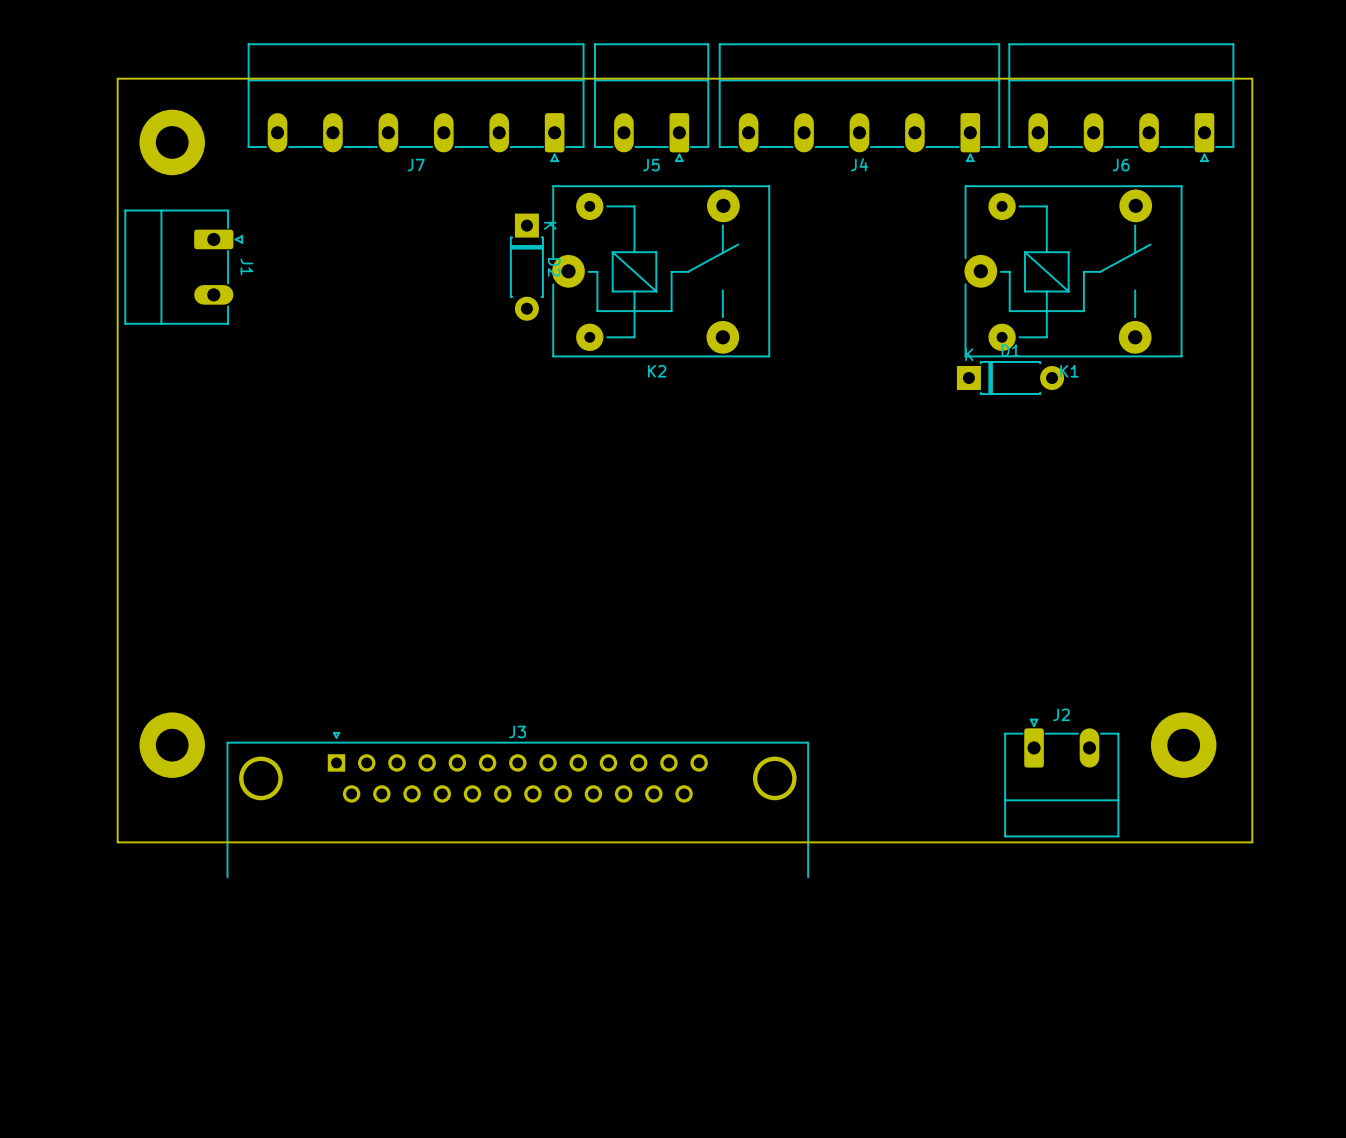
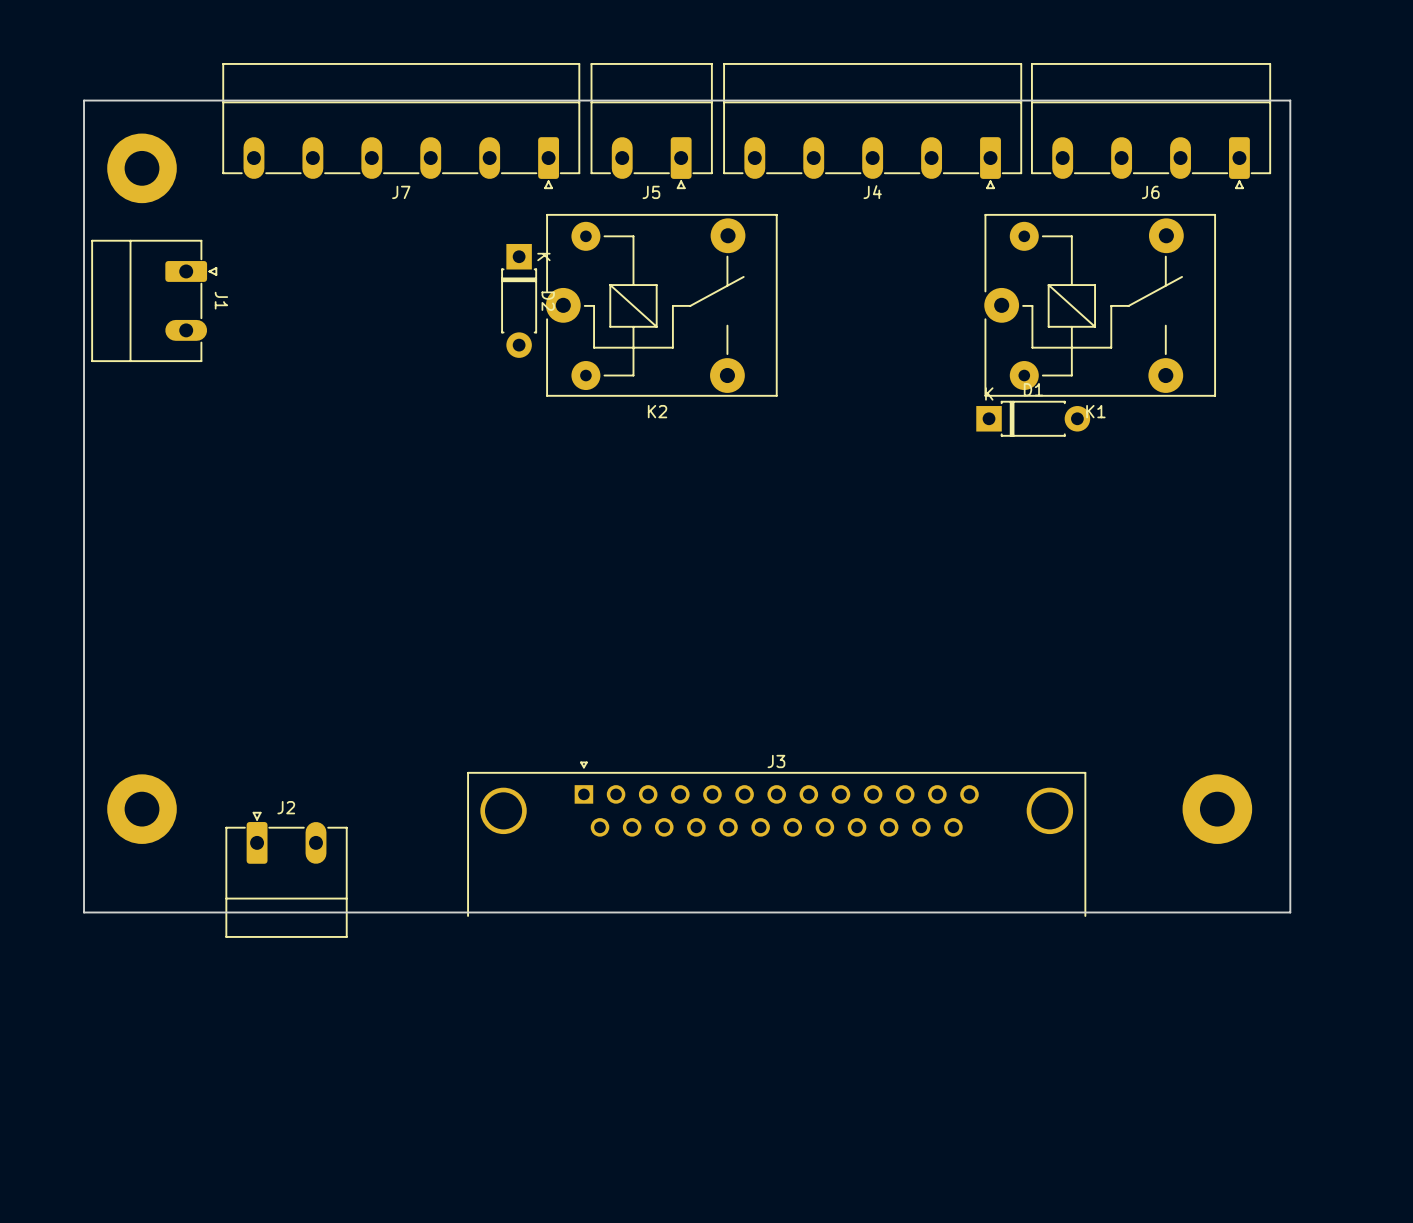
J2 position: (1061, 778) -> (286, 874)
J3 position: (517, 805) -> (776, 839)

